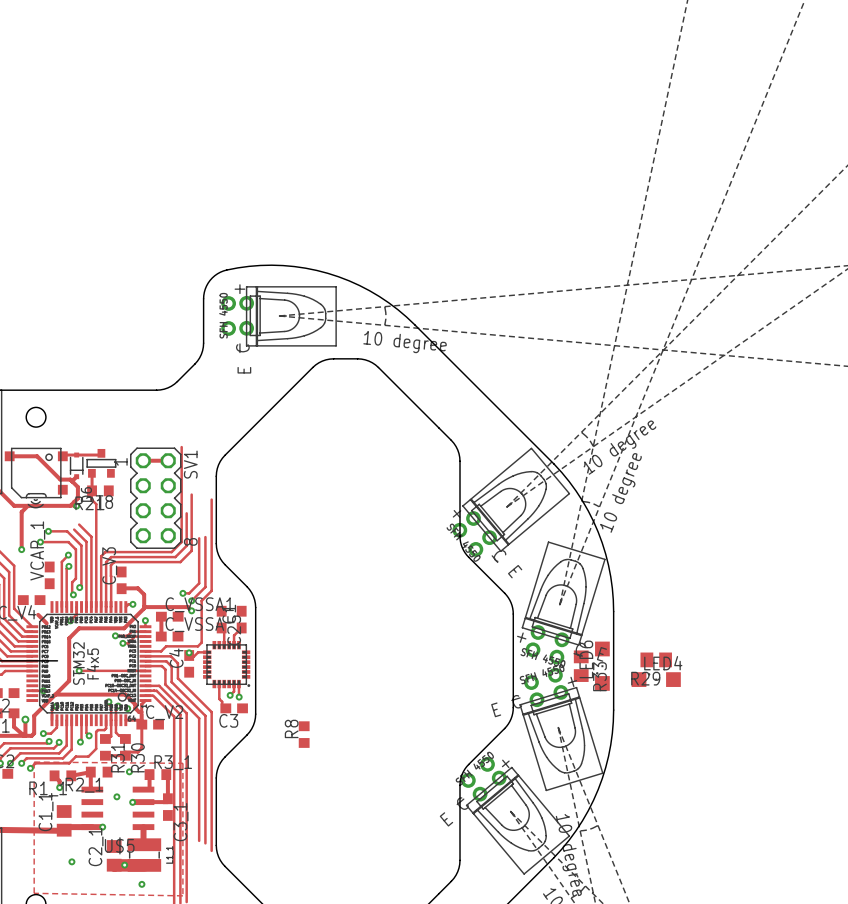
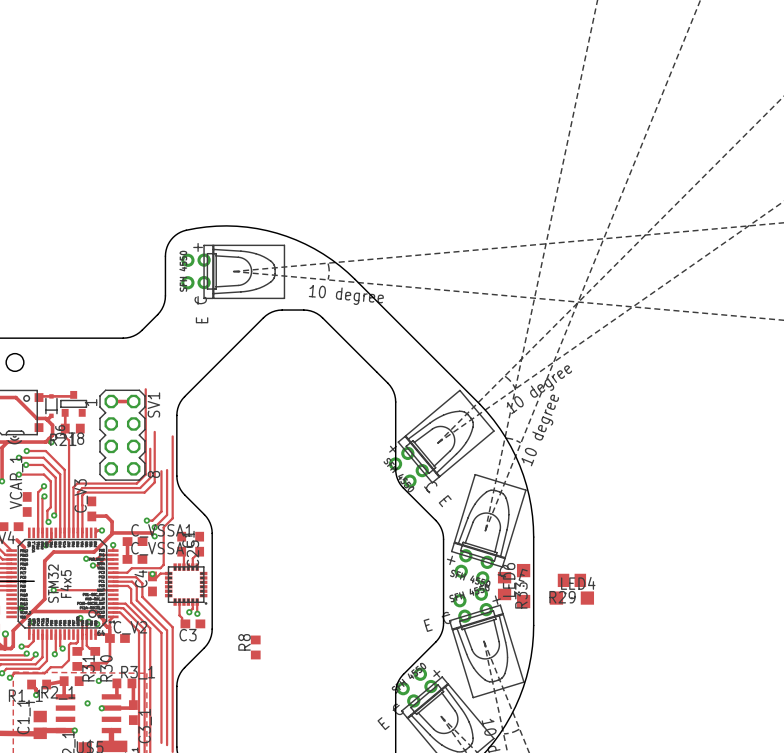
track: none -> (26, 451) (45, 451) (53, 458)
via: none -> (26, 451)
track: none -> (18, 457) (43, 457) (49, 463)
via: none -> (18, 457)

